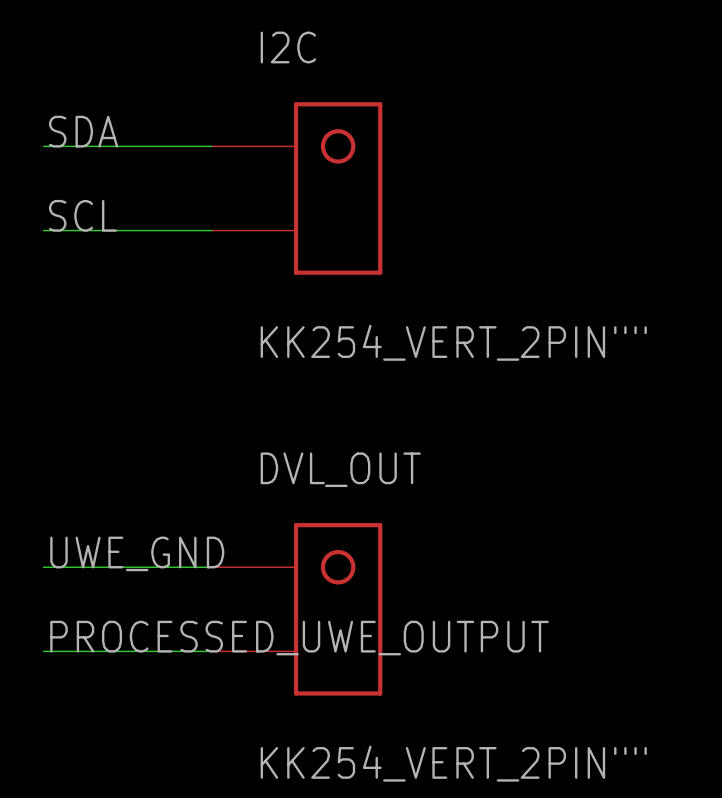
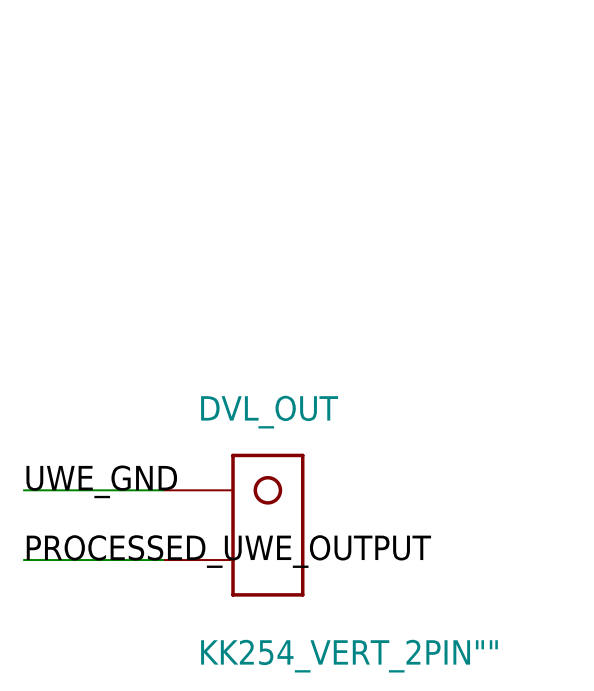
label: SDA (83, 131) -> none
wire: (43, 146) (211, 146) -> none
I2C: KK254_VERT_2PIN"" (297, 188) -> none
label: SCL (82, 215) -> none
wire: (43, 230) (211, 230) -> none

